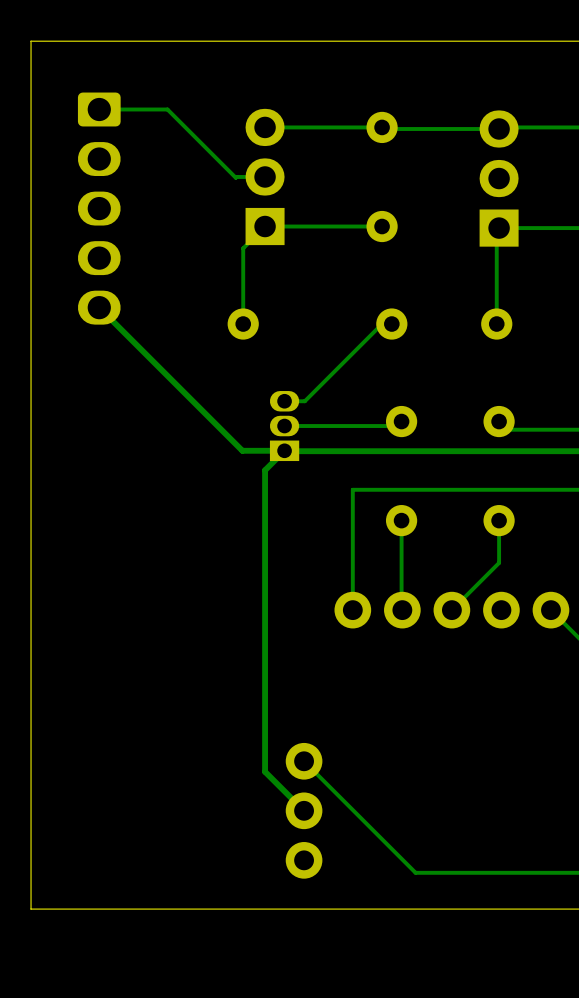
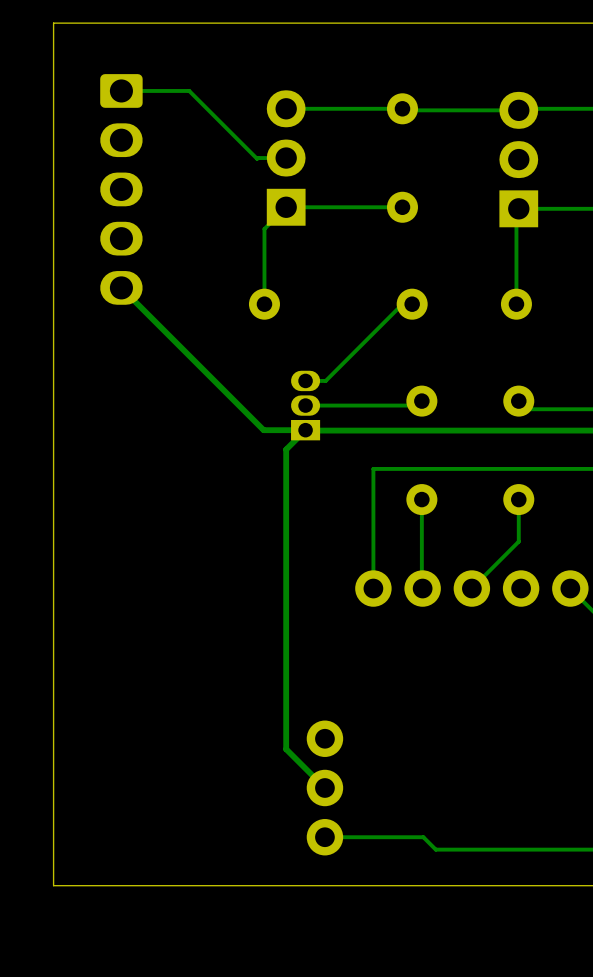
track: (304, 761) (403, 860) -> (324, 837) (423, 837)

